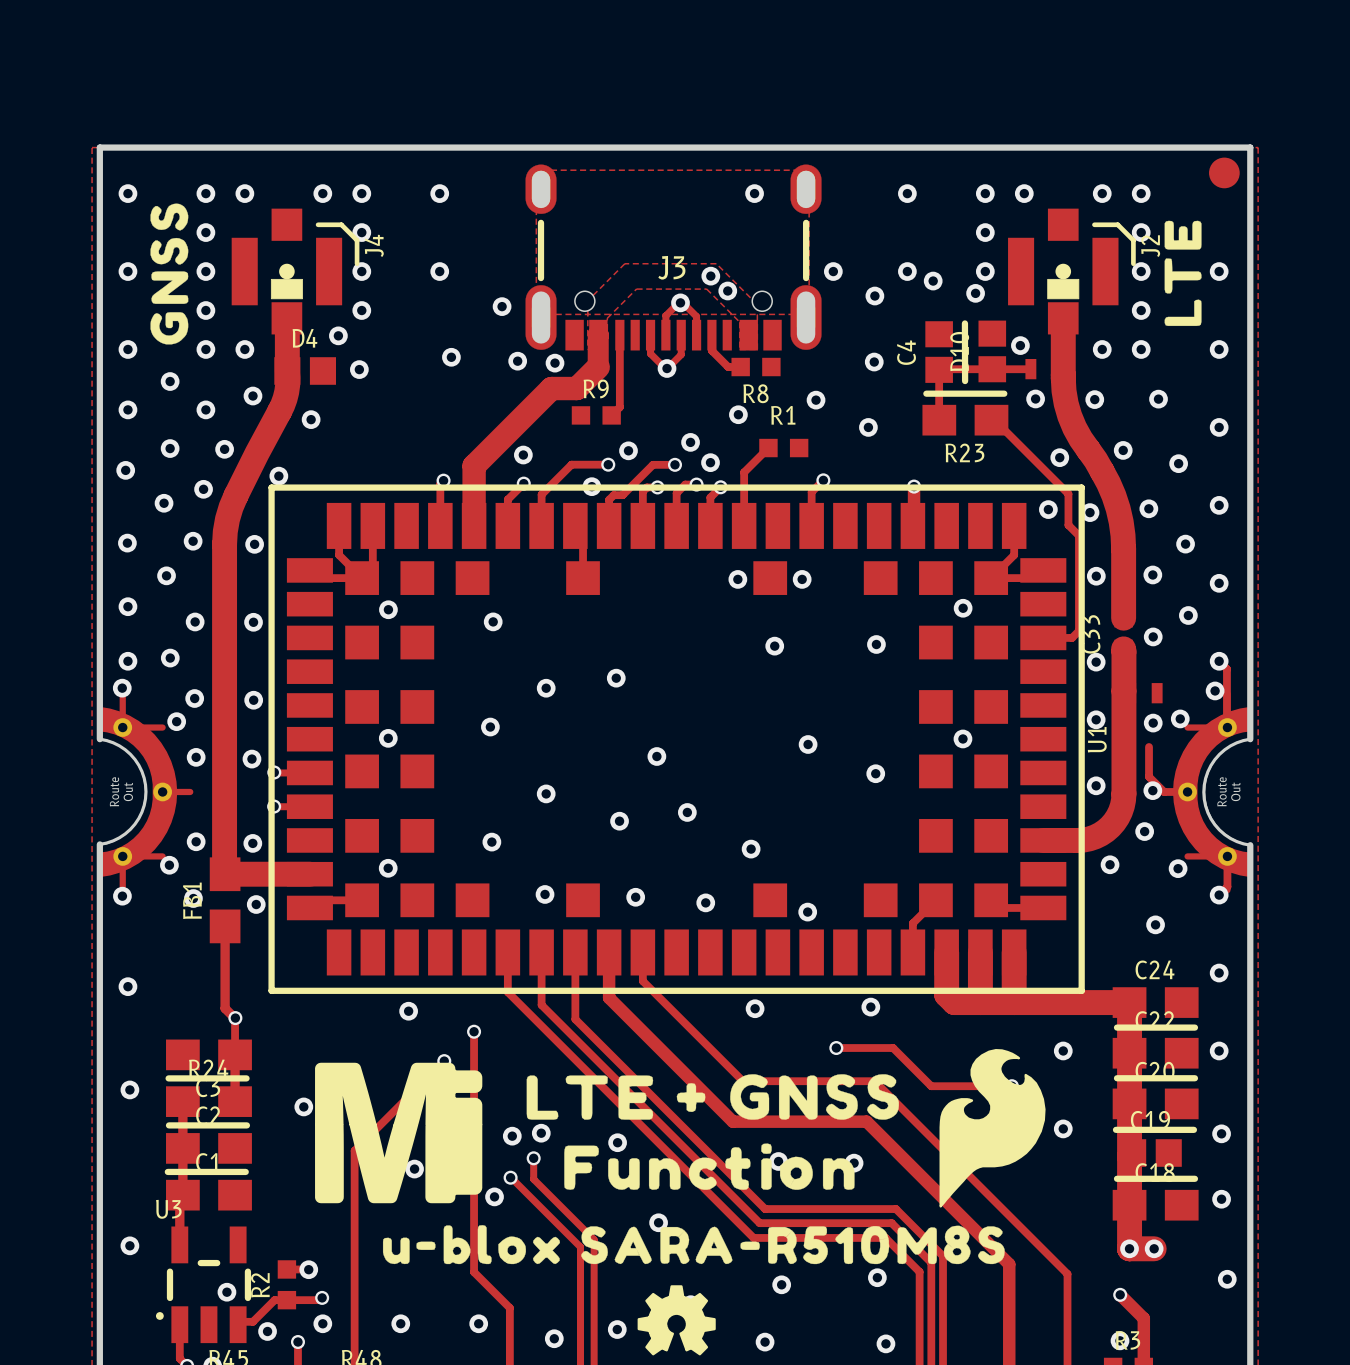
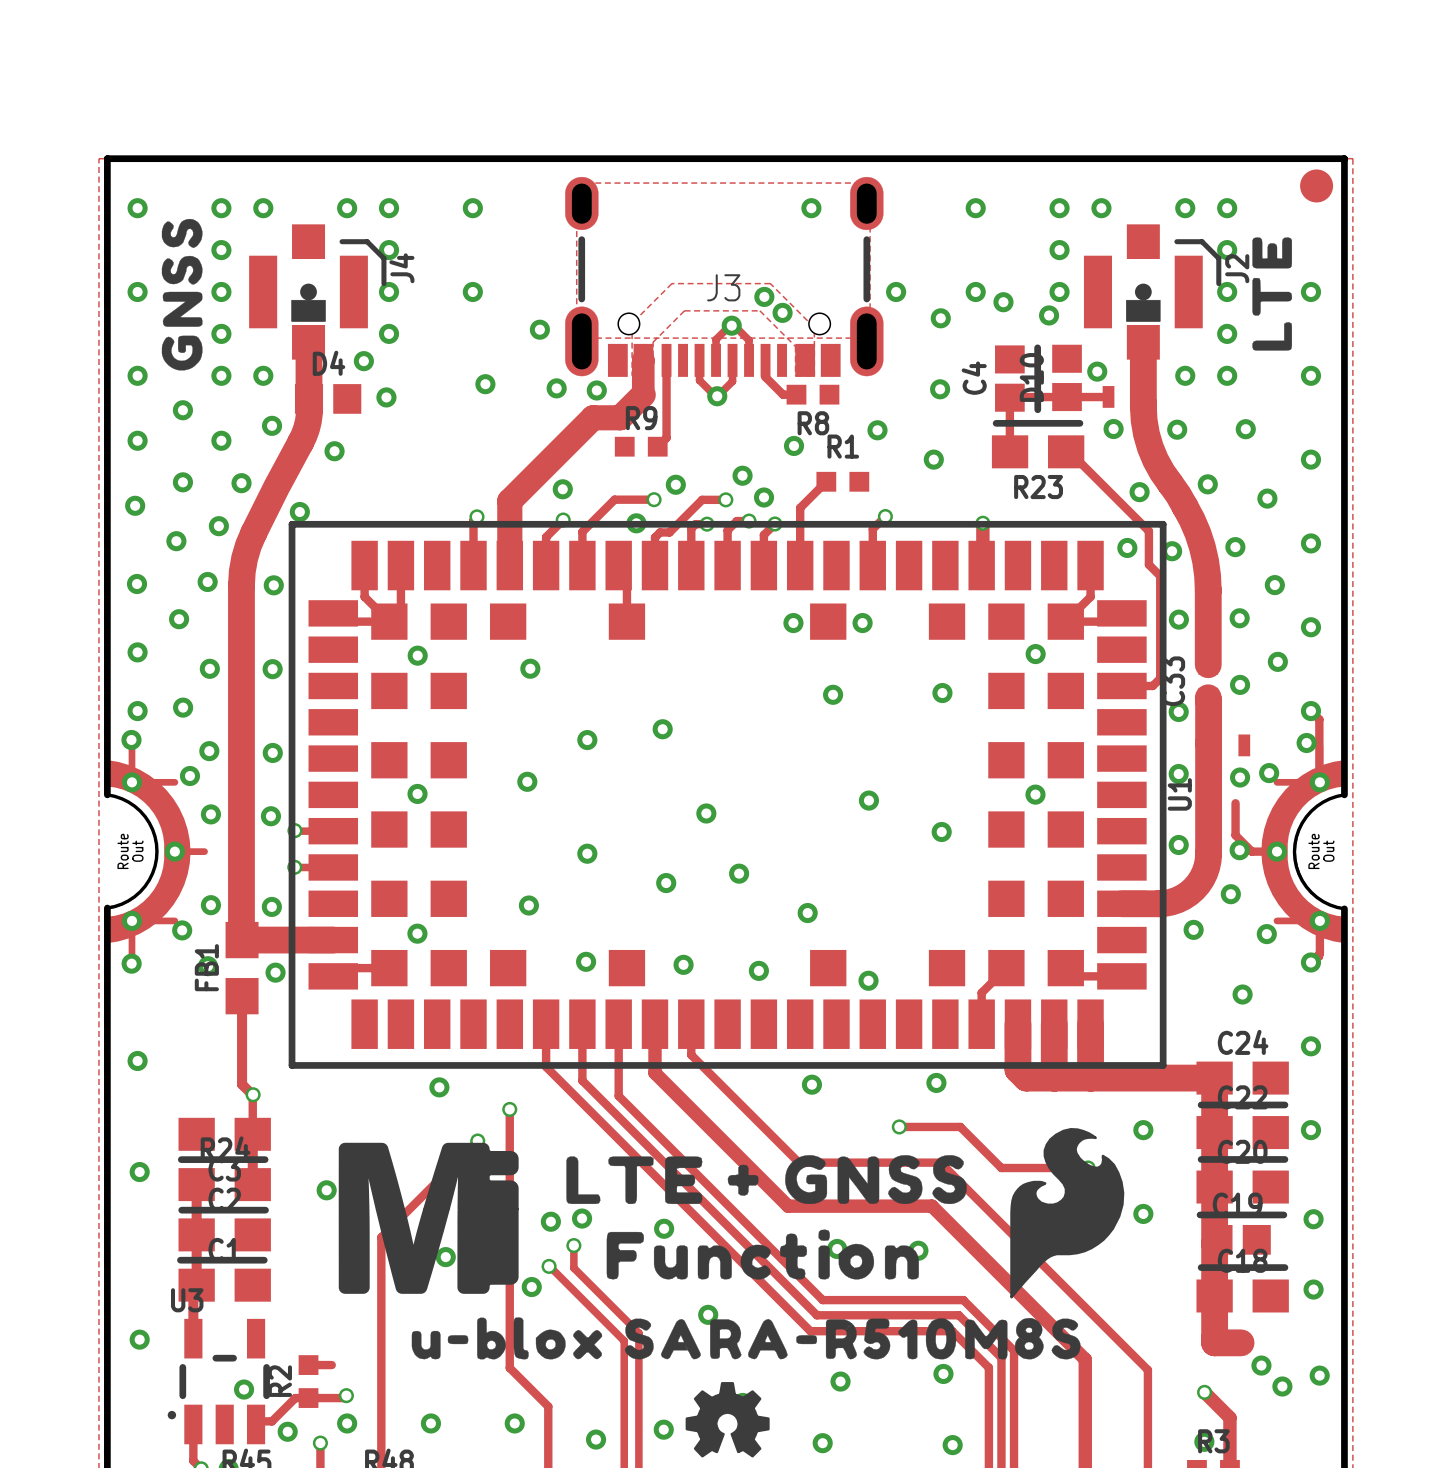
via: (1129, 1248) -> none
via: (1154, 1248) -> none
via: (308, 1269) -> none
via: none -> (1261, 1365)
via: none -> (1282, 1386)

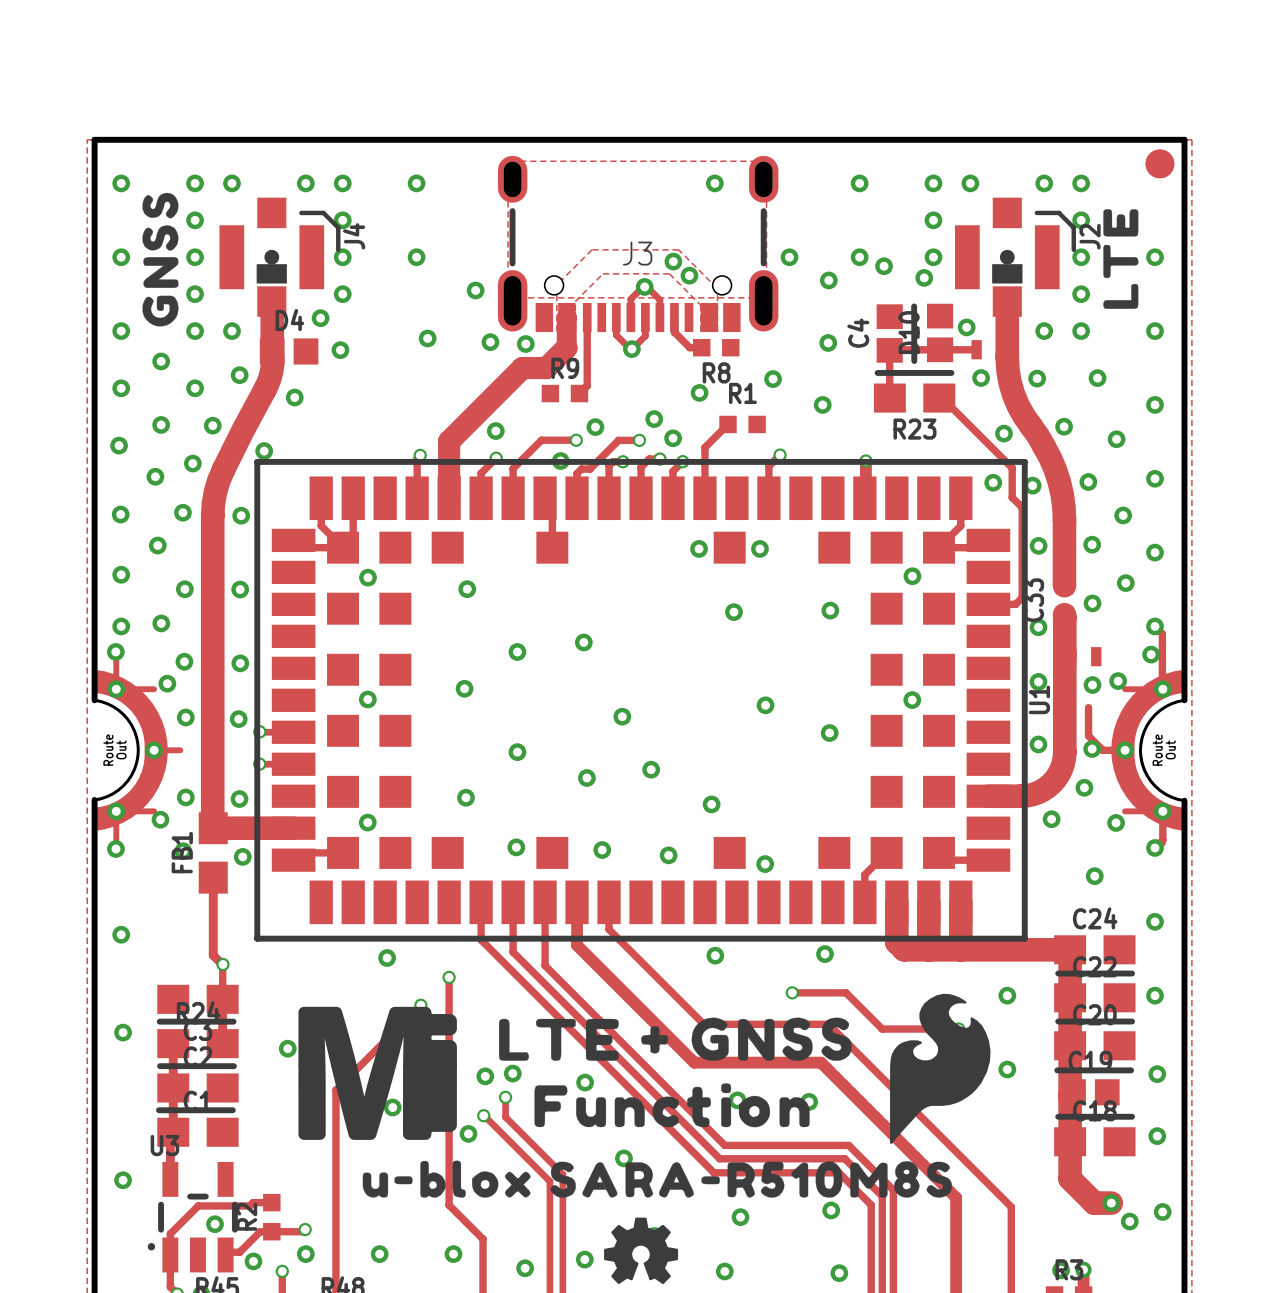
track: (1214, 1338) (1214, 1342) (1241, 1342) -> (1070, 1178) (1094, 1203) (1111, 1203)
track: (308, 1365) (331, 1365) -> (271, 1202) (253, 1202) (249, 1205) (198, 1205) (170, 1233) (170, 1254)
track: (1204, 1392) (1229, 1417) (1229, 1441) -> none
via: (1204, 1392) -> none
via: none -> (1083, 1269)

